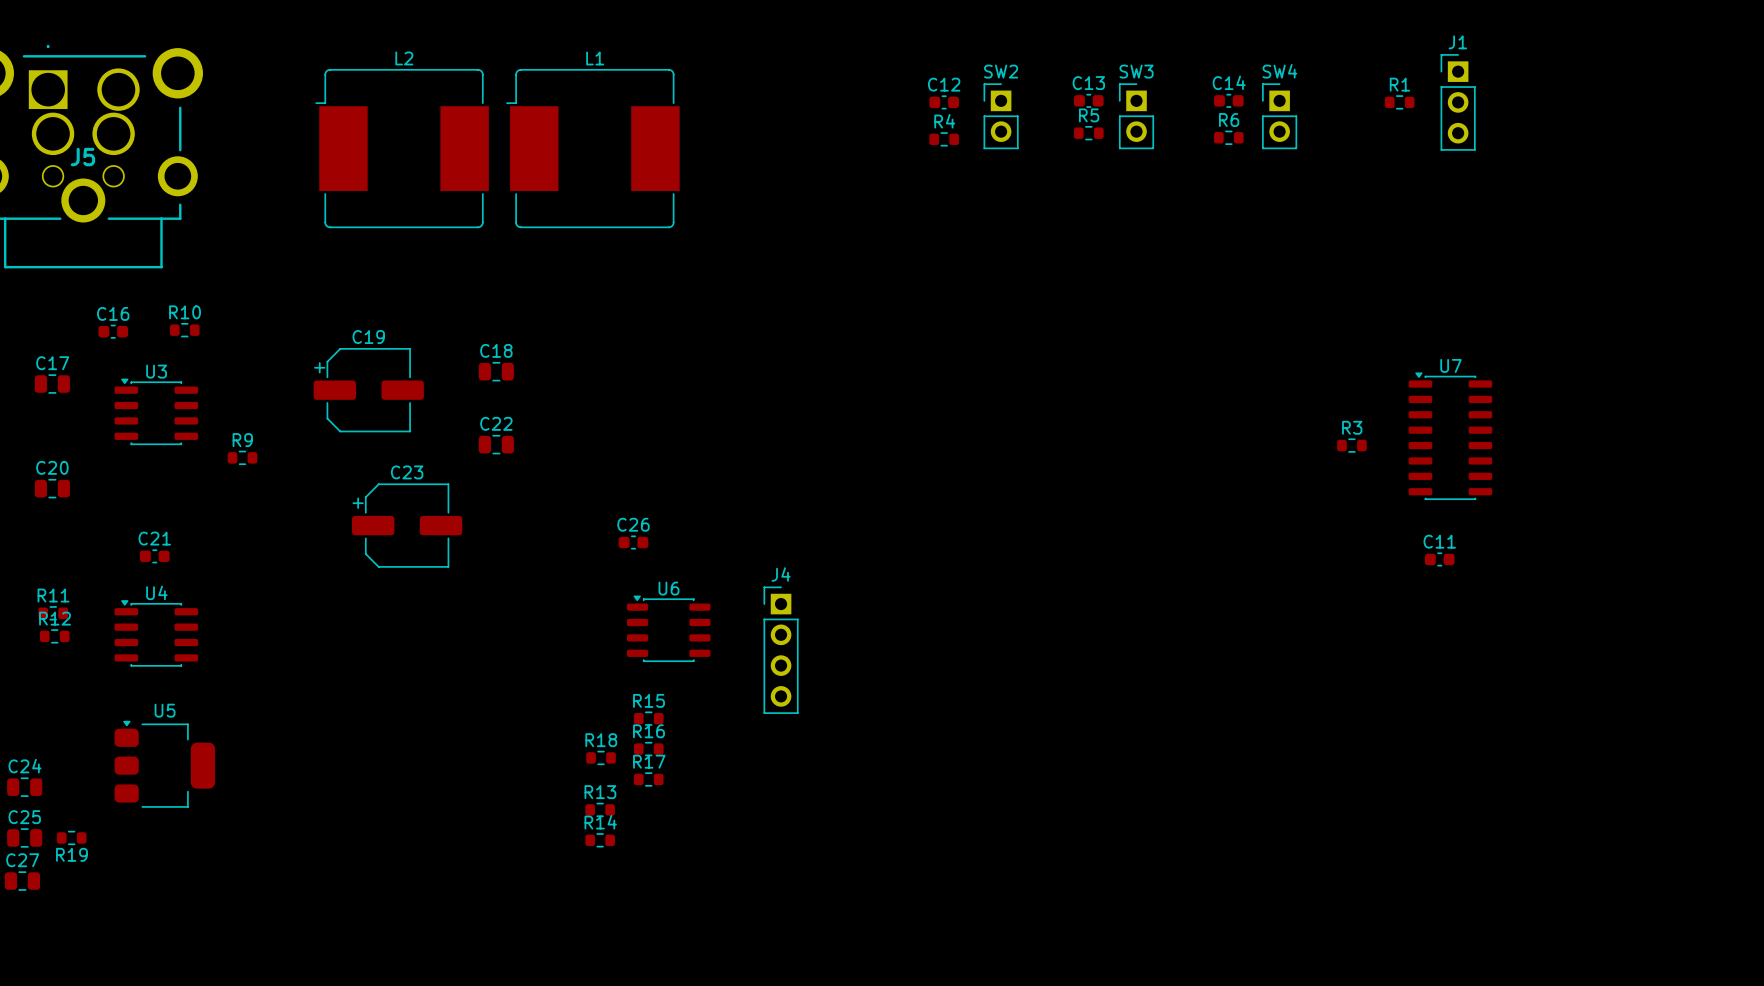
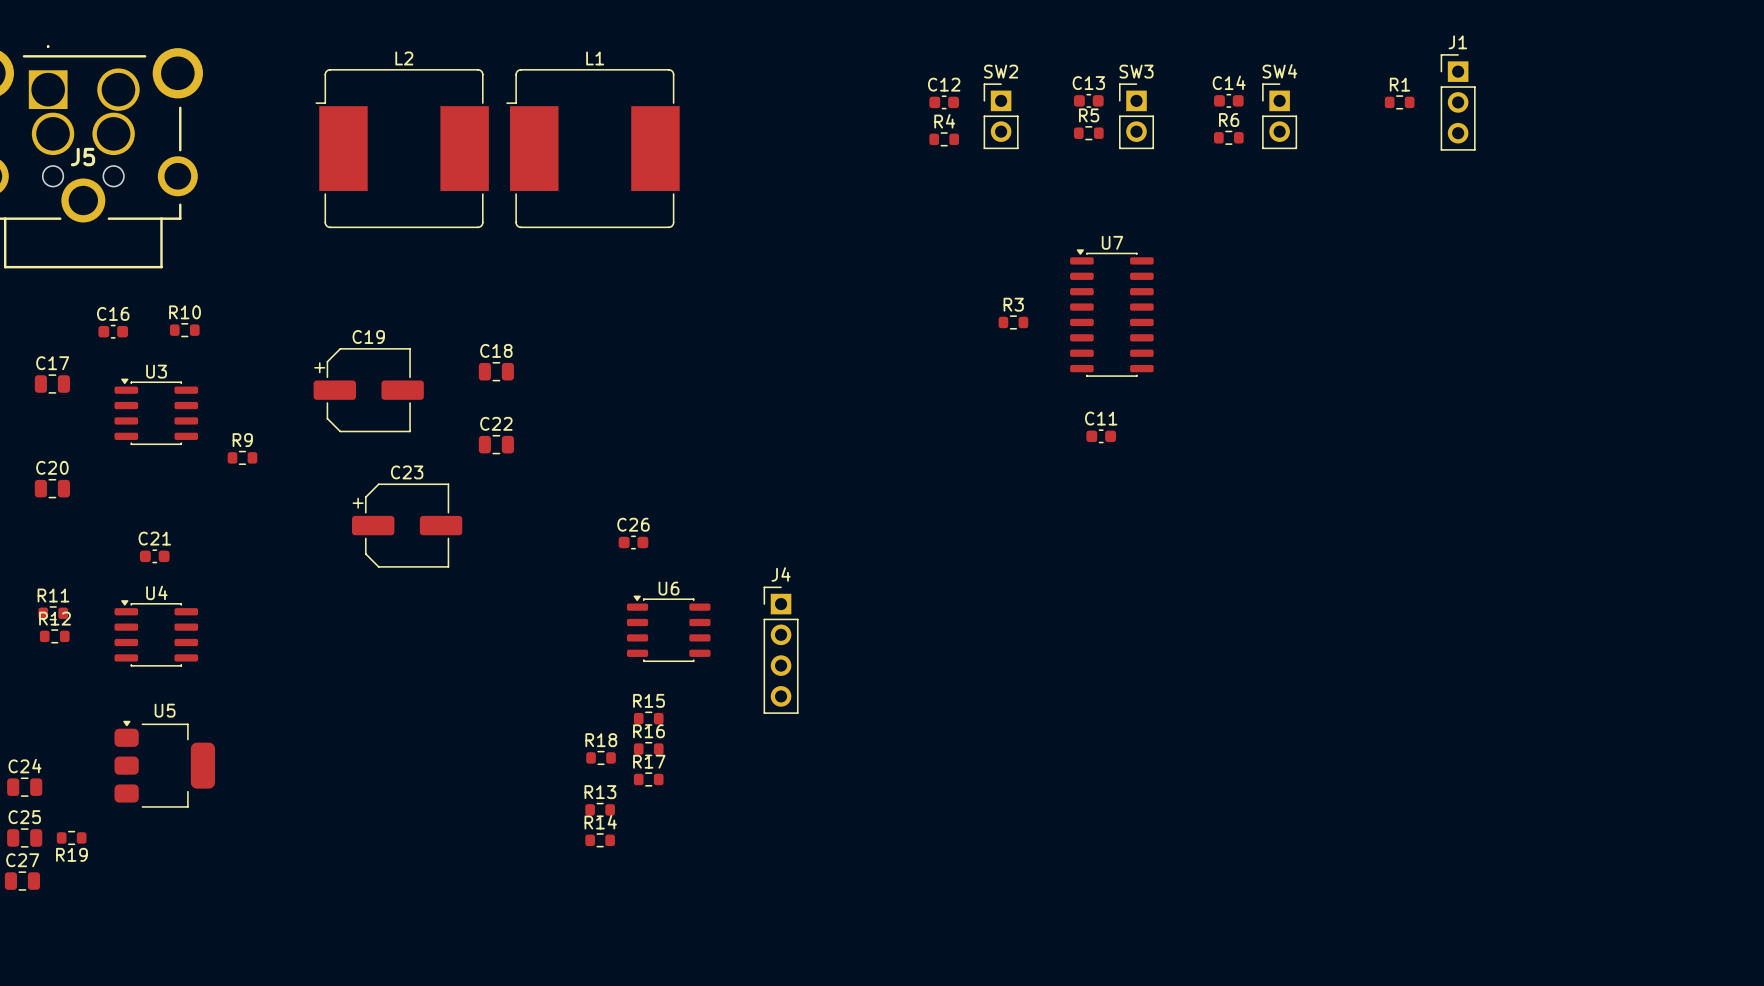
U7 position: (1450, 436) -> (1111, 313)
R3 position: (1351, 445) -> (1013, 322)
C11 position: (1439, 559) -> (1101, 436)

